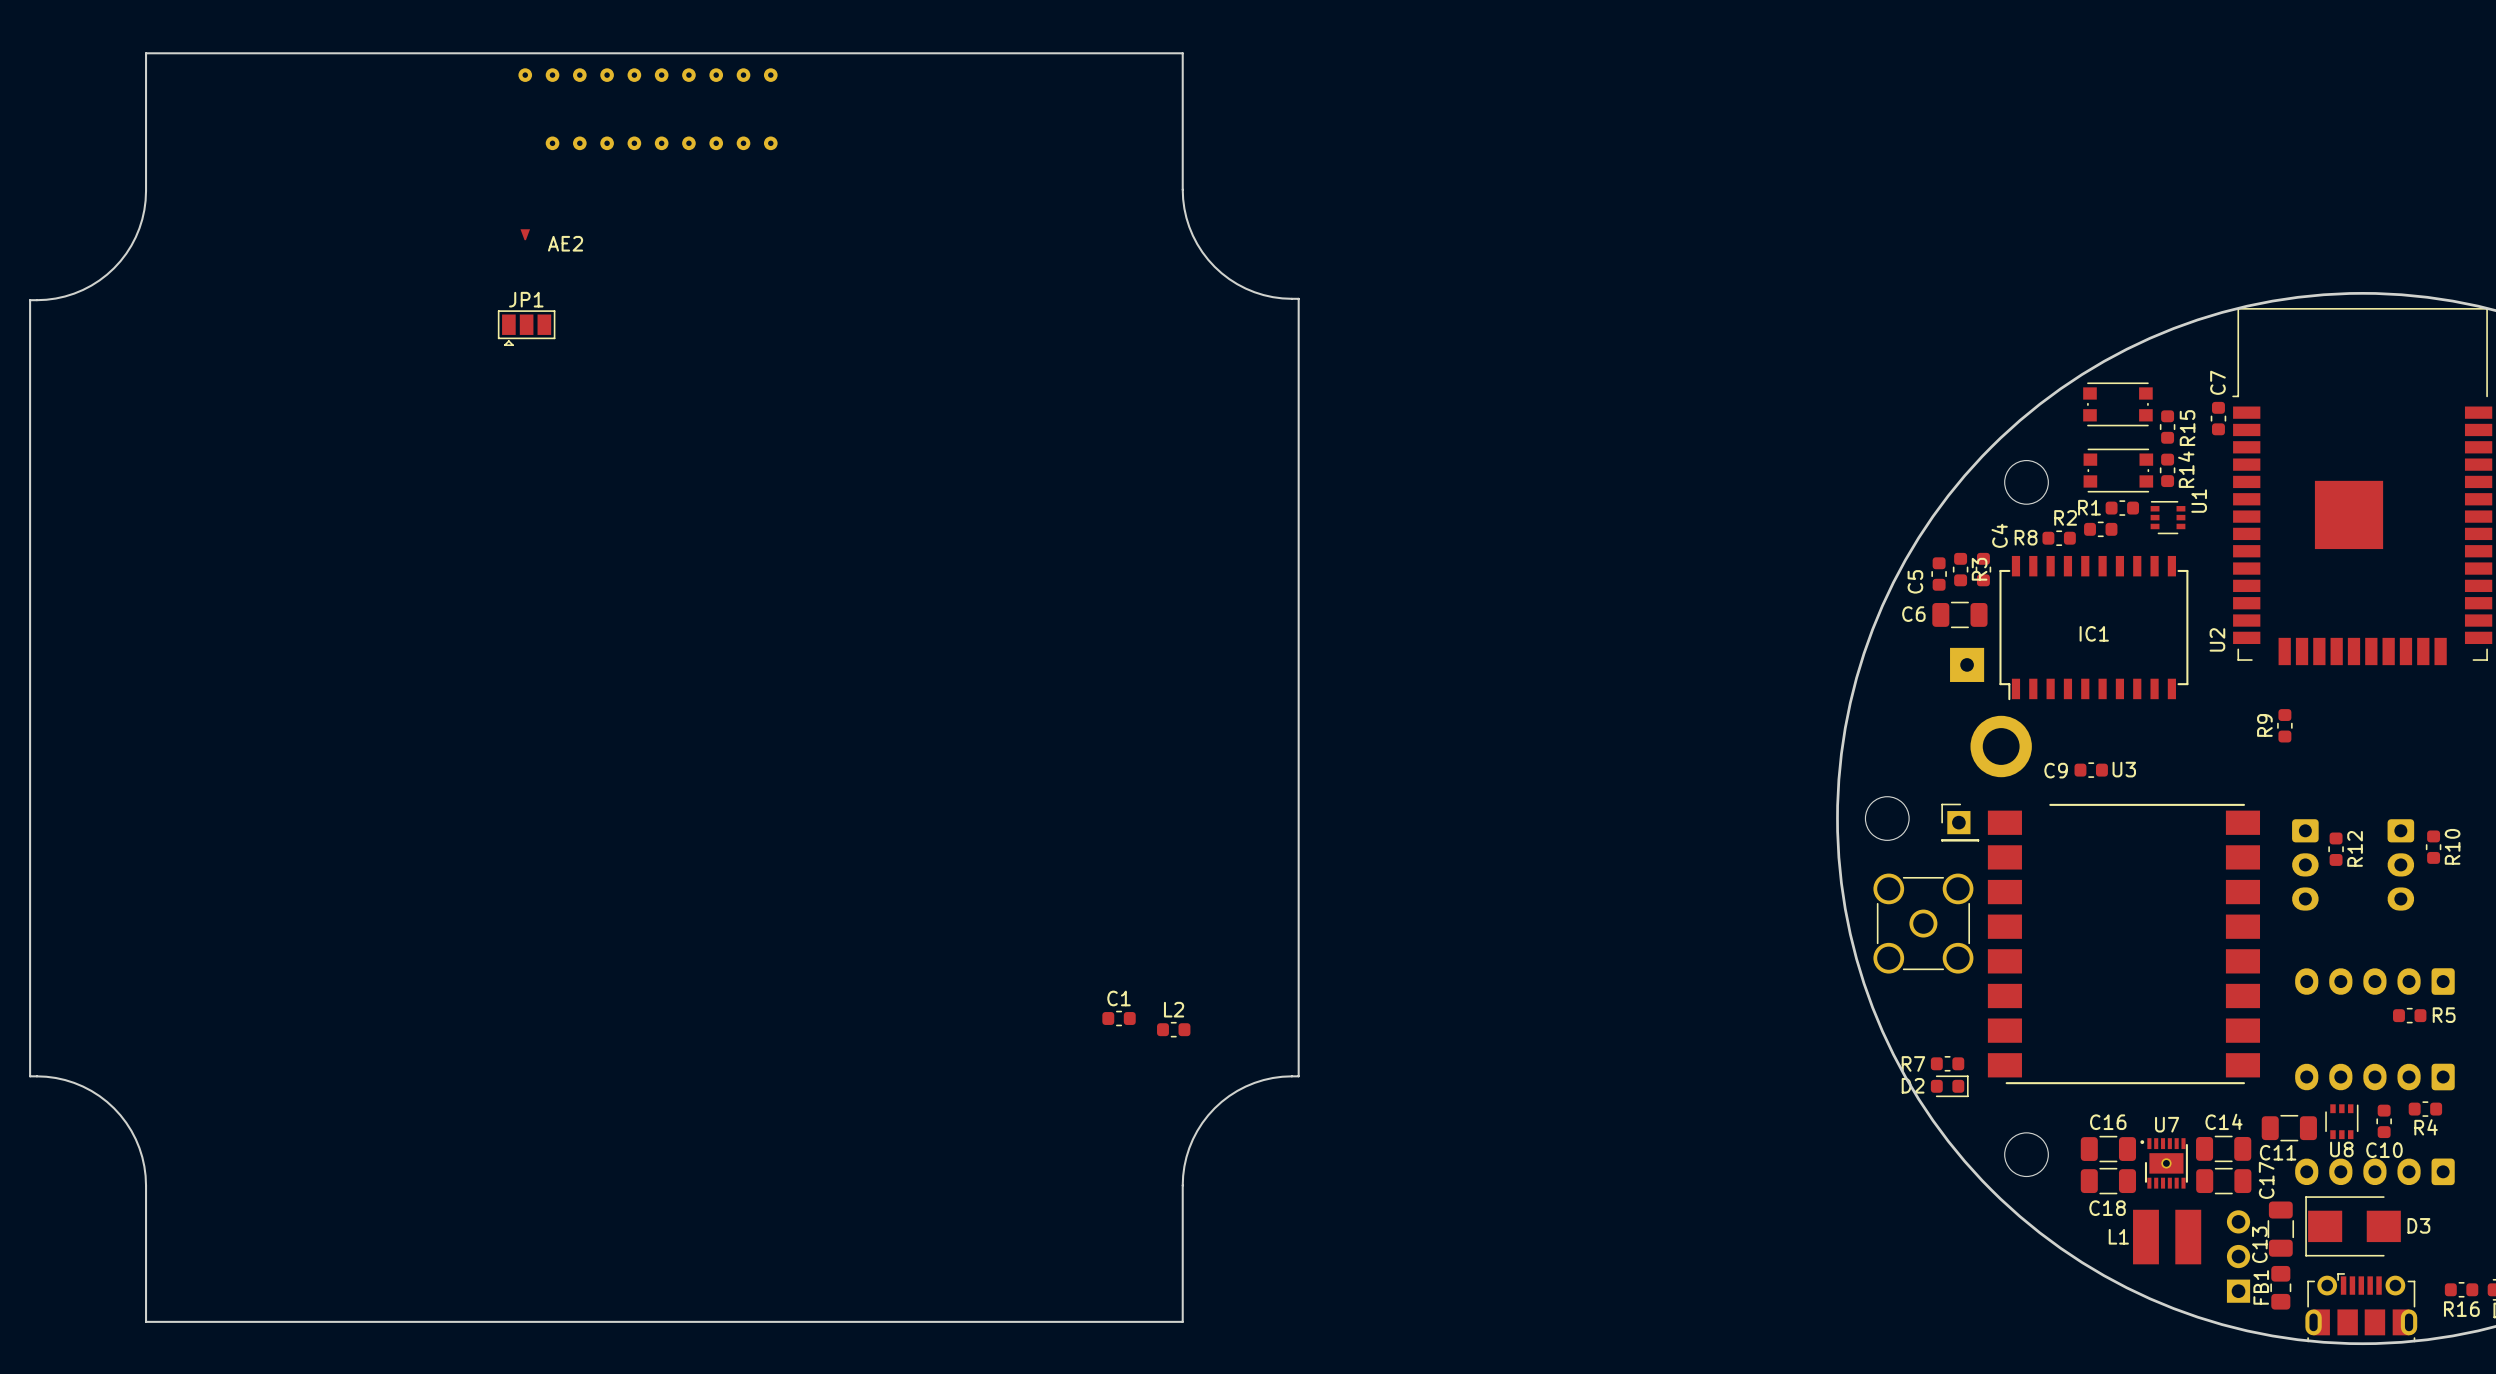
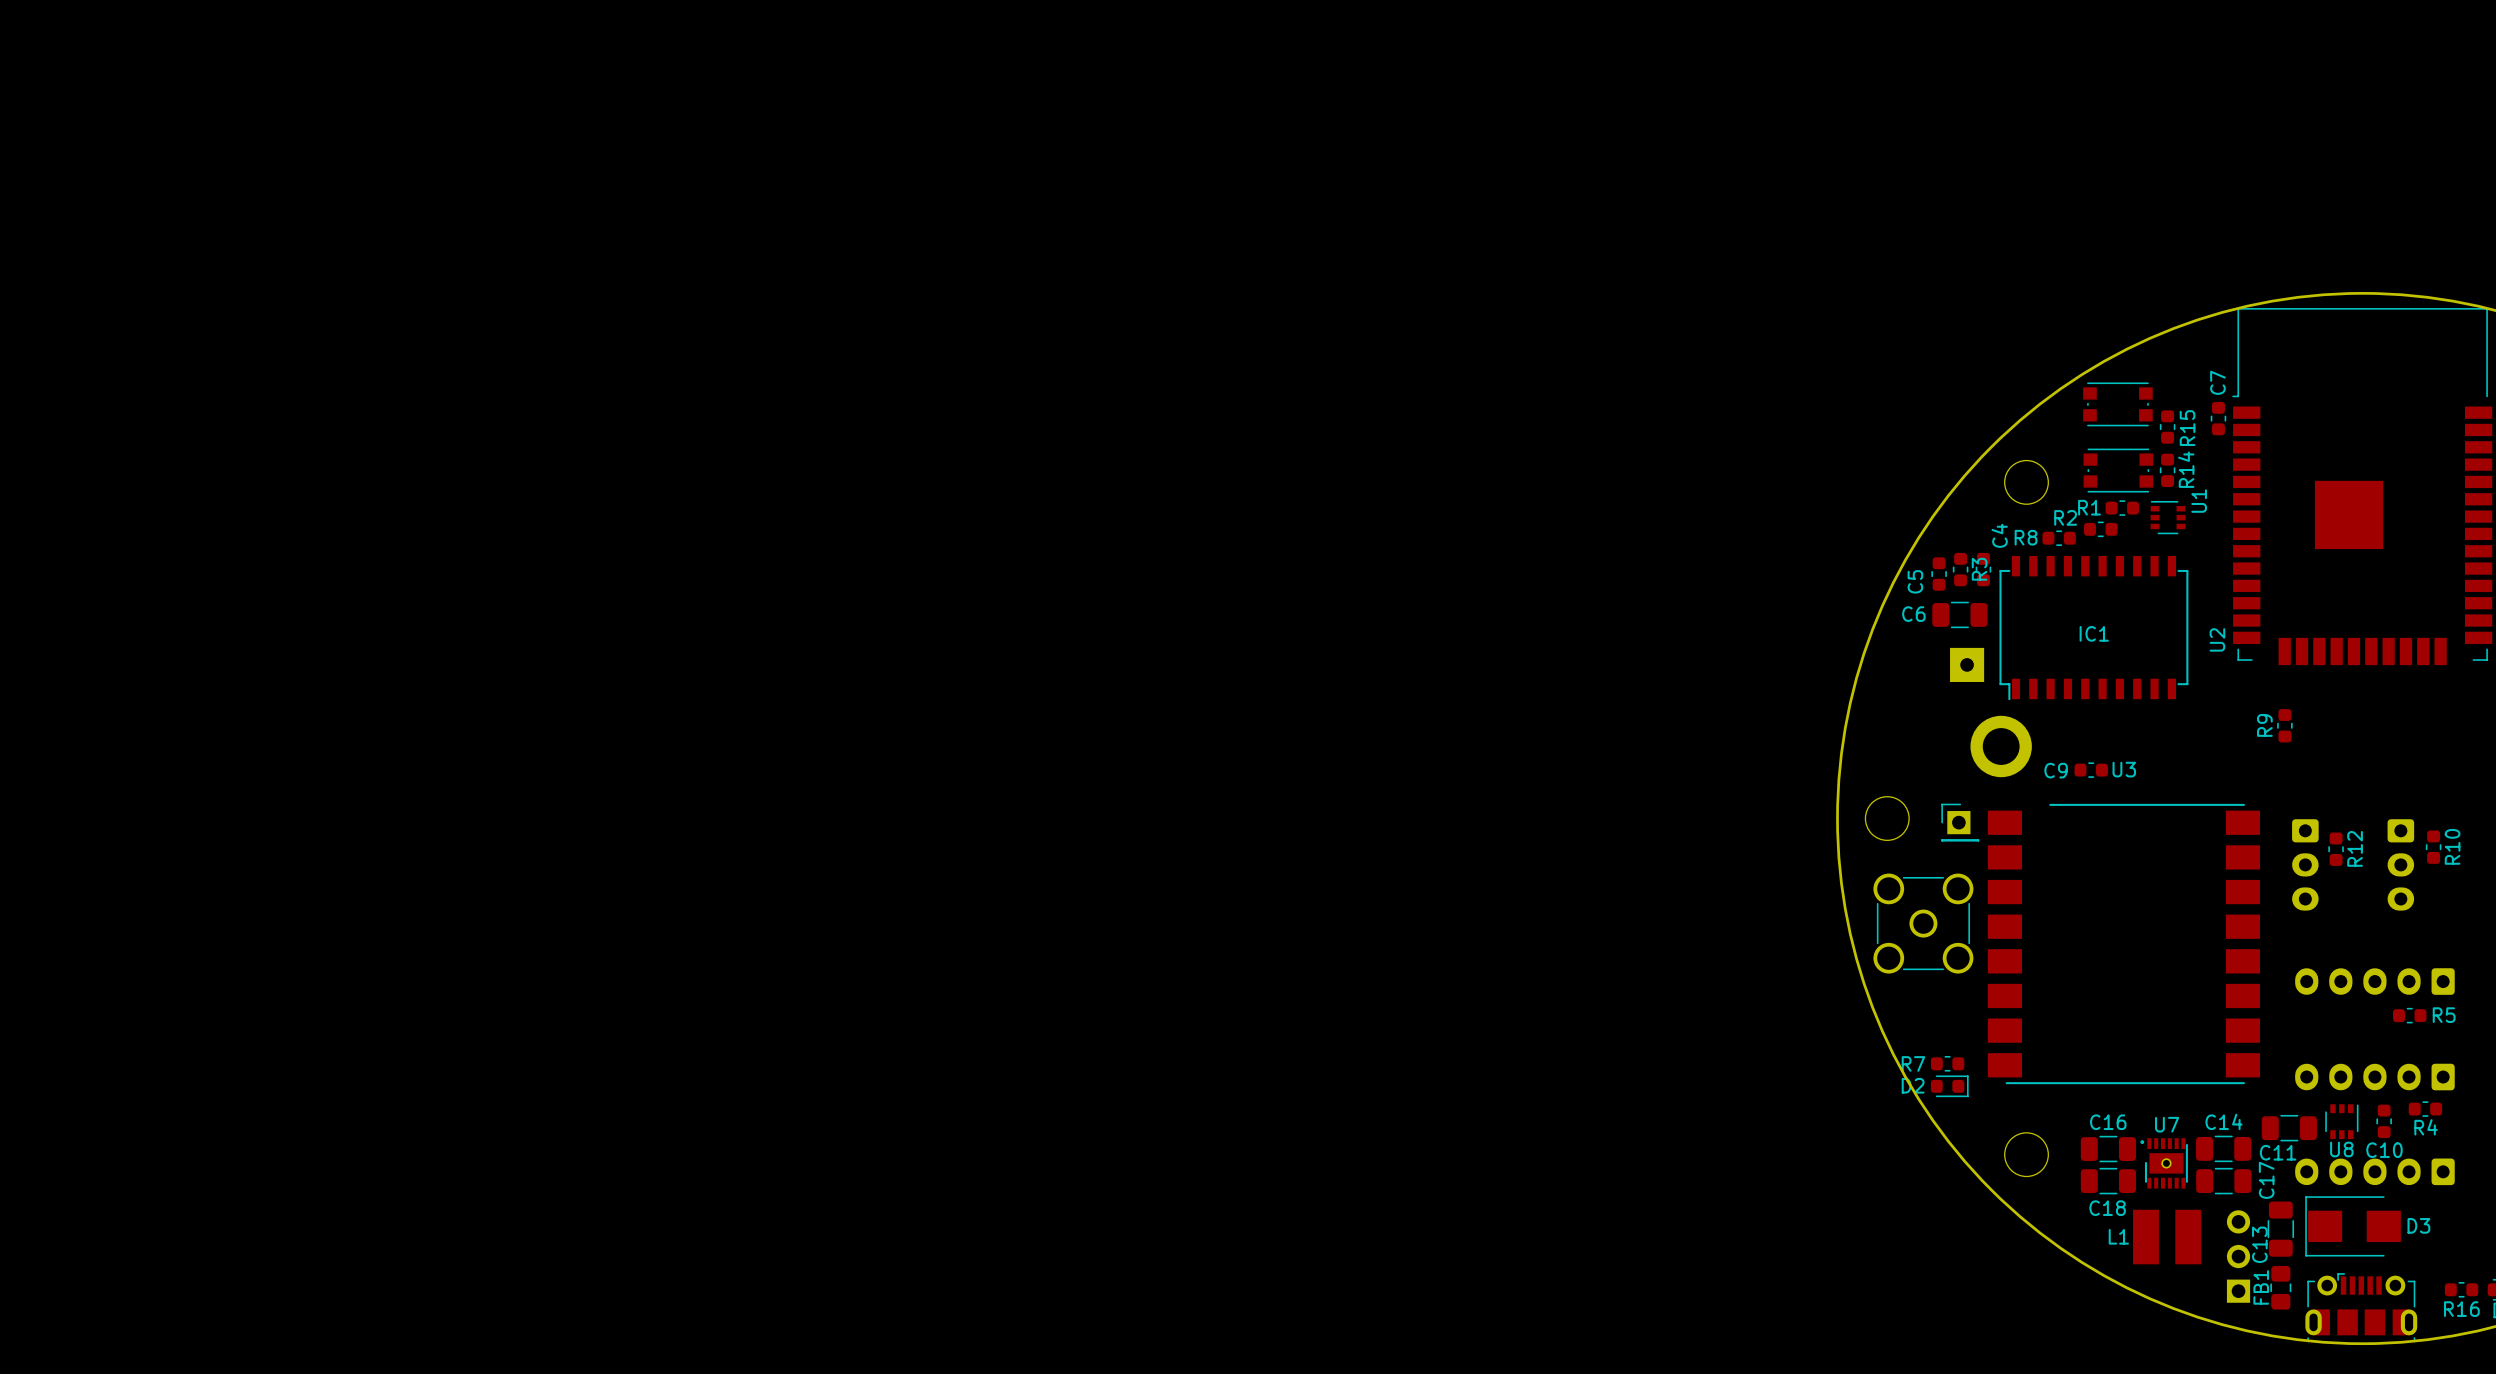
board edge: (146, 53) (145, 200) (142, 219) (135, 237) (126, 253) (114, 268) (91, 285) (65, 296) (30, 300) (30, 1076) (65, 1080) (91, 1090) (114, 1108) (126, 1122) (135, 1139) (142, 1157) (145, 1175) (146, 1321) (1182, 1321) (1183, 1175) (1186, 1157) (1192, 1139) (1202, 1122) (1214, 1108) (1237, 1090) (1263, 1080) (1298, 1076) (1298, 298) (1263, 295) (1237, 284) (1214, 266) (1202, 252) (1192, 235) (1186, 217) (1183, 199) (1182, 53) (146, 53) -> none
AE2: (648, 154) -> none
JP1: (526, 328) -> none
C1: (1119, 1018) -> none
L2: (1173, 1029) -> none

